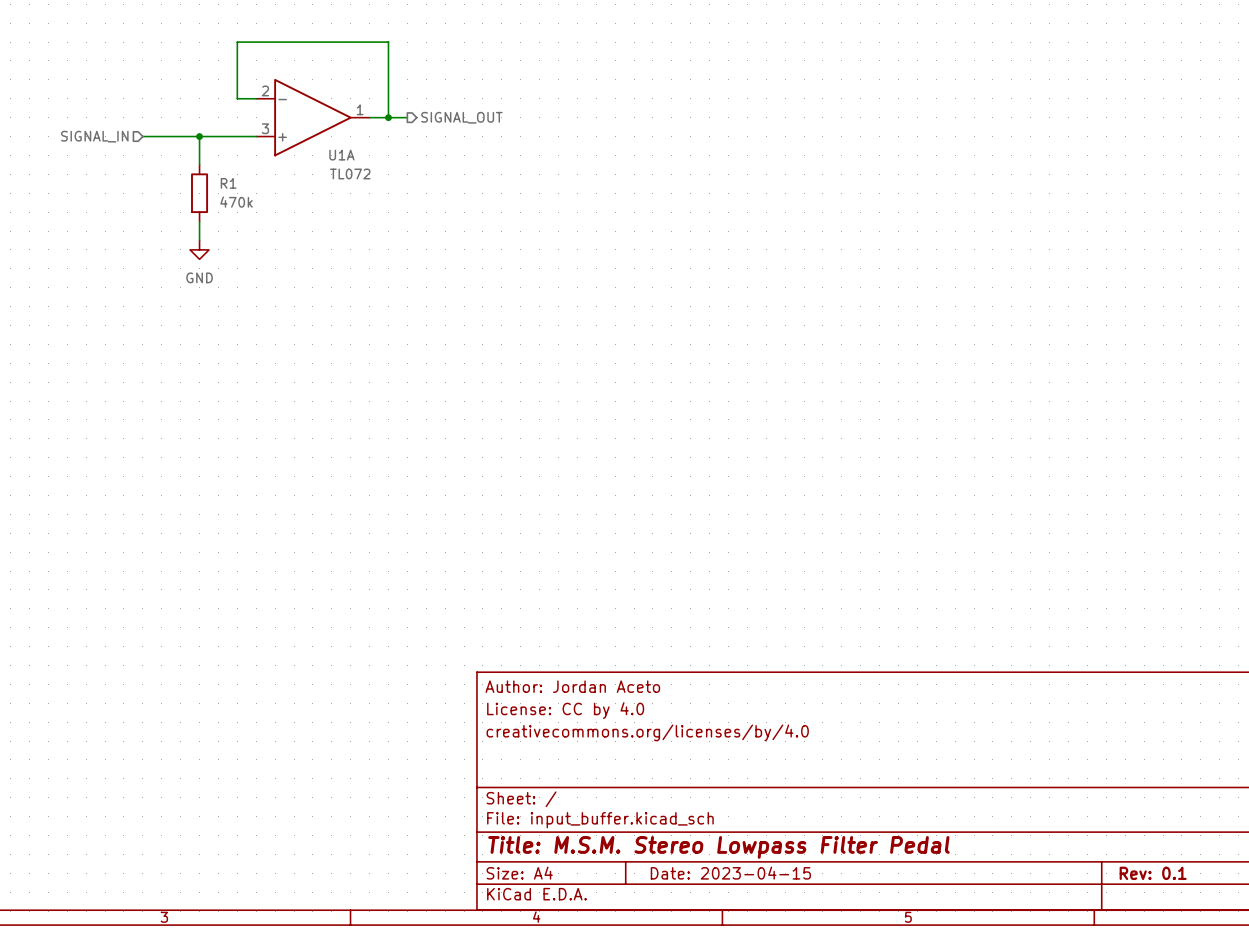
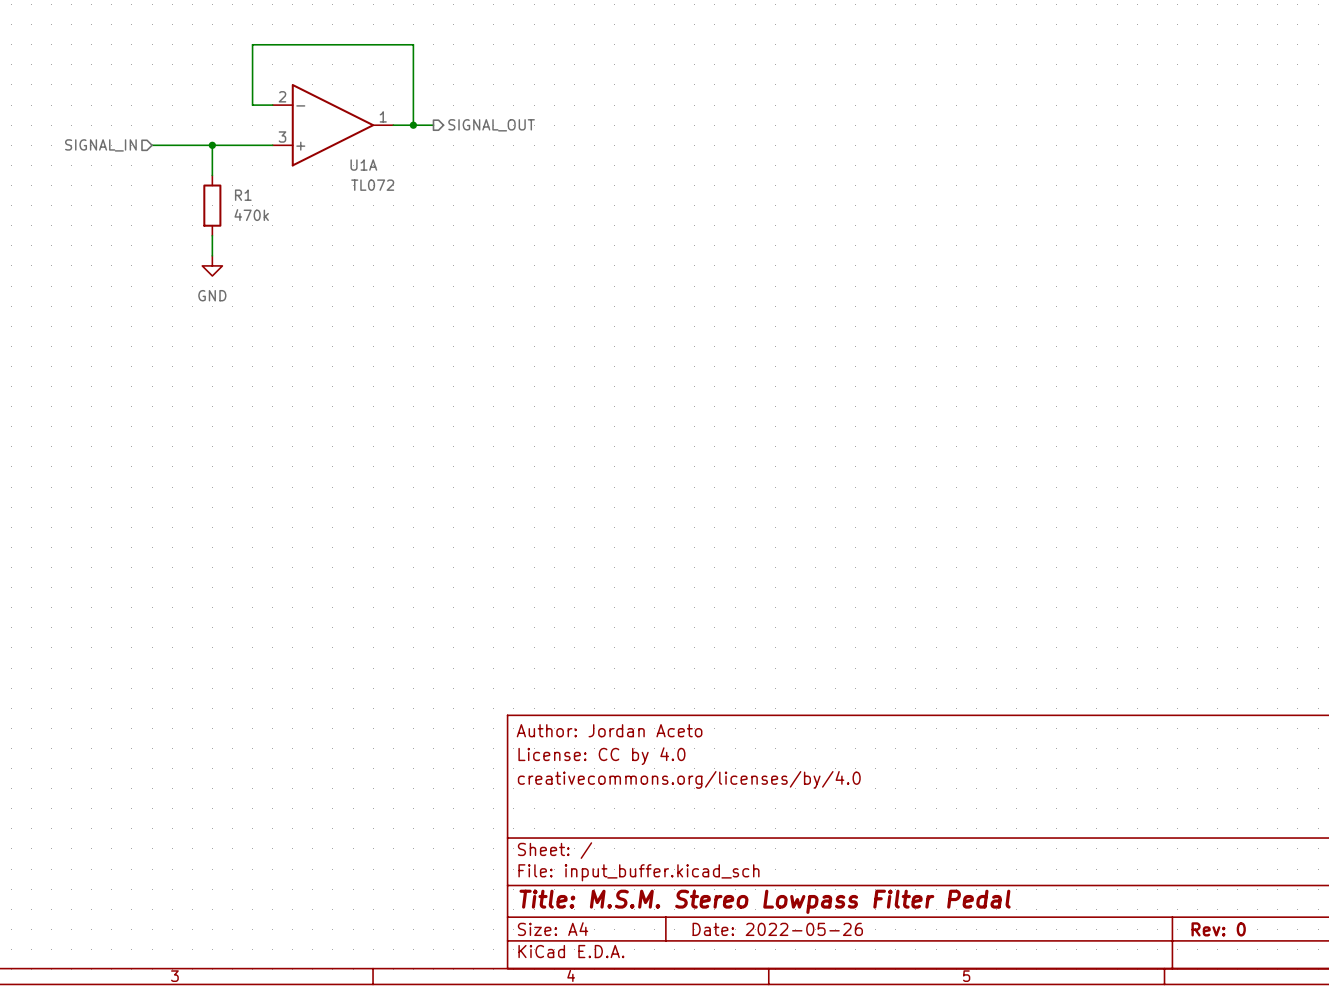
title block: Date: 2023-04-15 (730, 873) -> Date: 2022-05-26 (777, 929)
title block: Rev: 0.1 (1153, 873) -> Rev: 0 (1218, 929)

